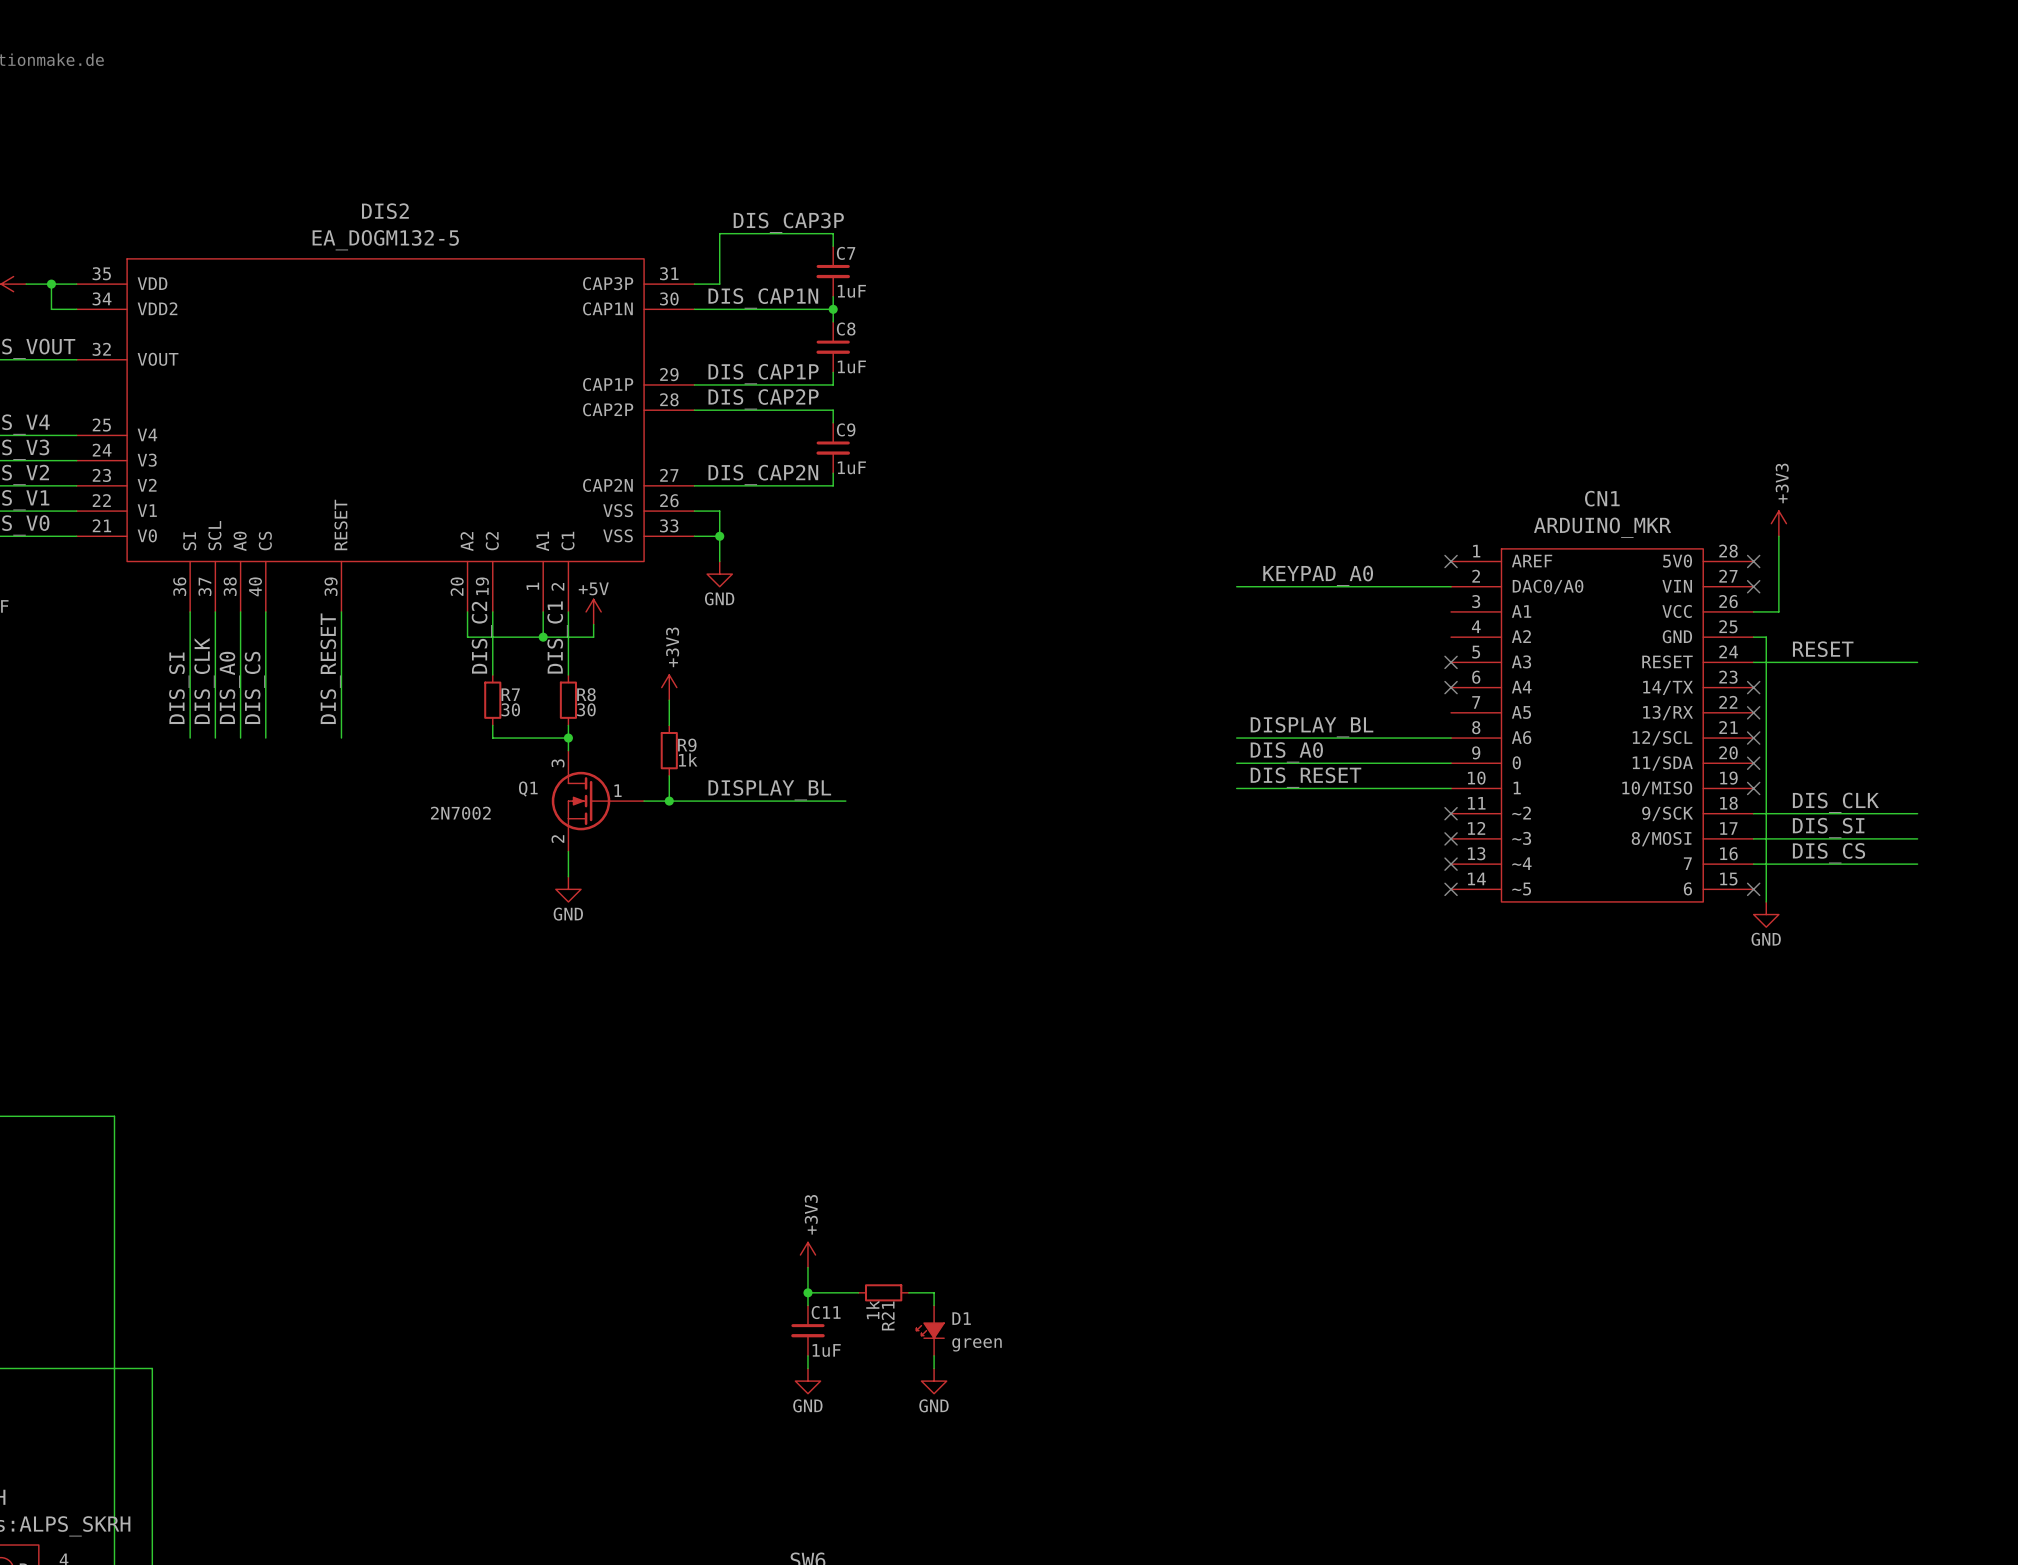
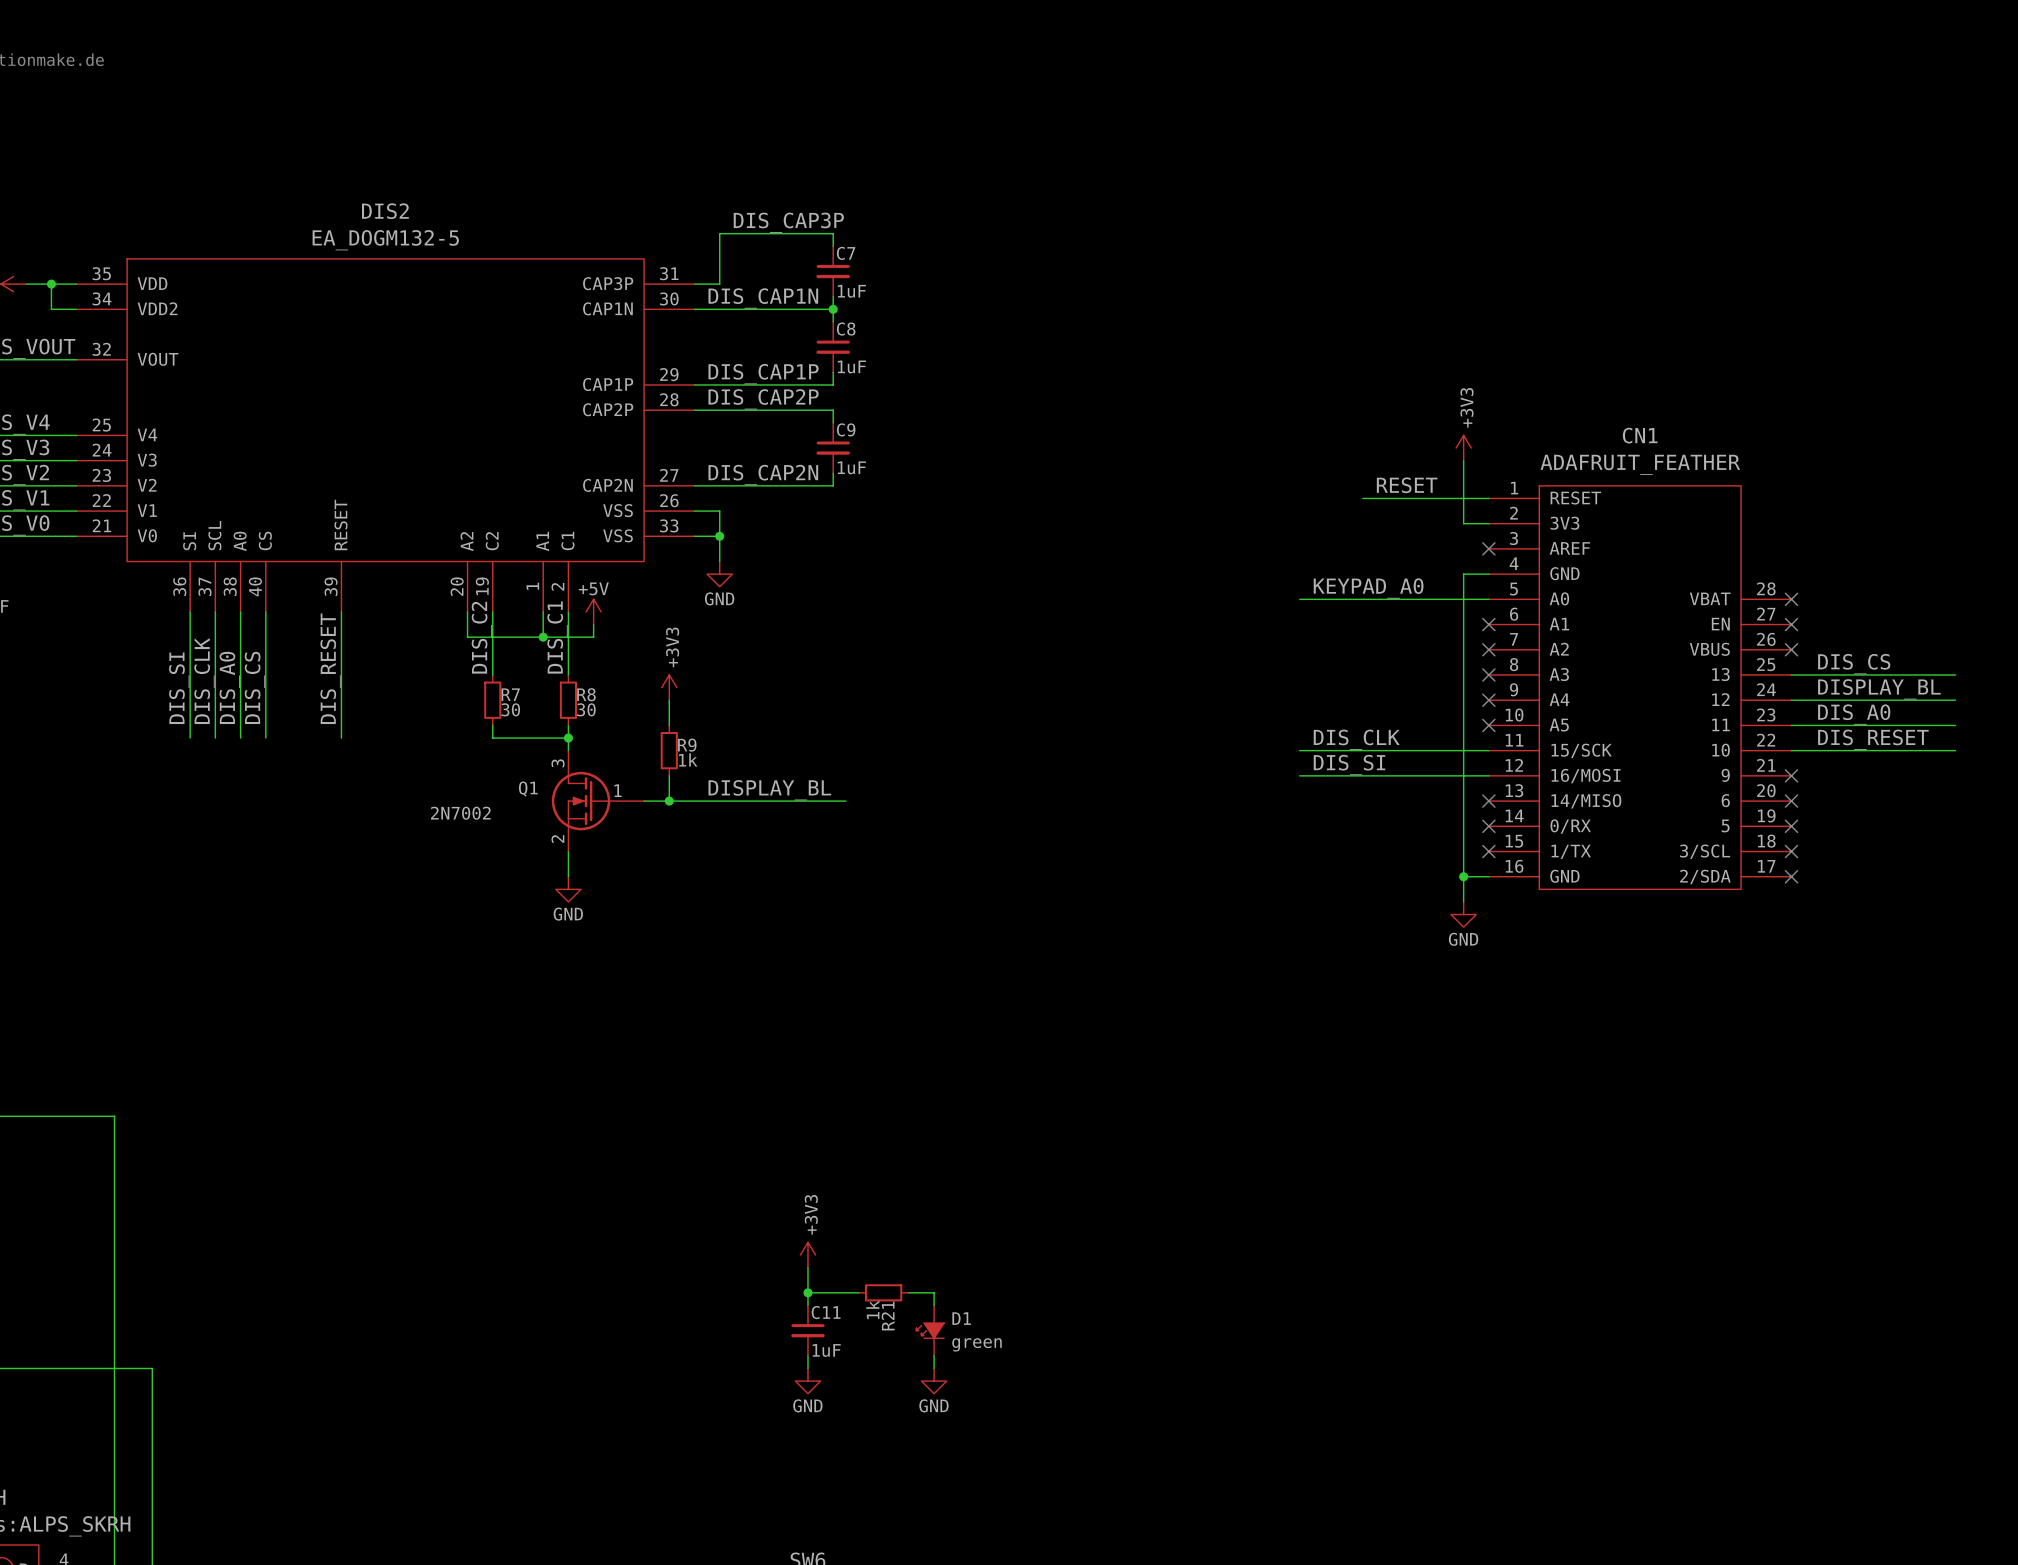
power symbol: none -> +3V3 (1463, 448)
wire: none -> (1463, 460) (1463, 523) (1488, 523)
label: none -> RESET (1407, 485)
wire: none -> (1362, 498) (1488, 498)
CN1 name position: CN1 (1602, 498) -> CN1 (1640, 435)
power symbol: +3V3 (1778, 523) -> none
CN1 value: ARDUINO_MKR (1602, 527) -> ADAFRUIT_FEATHER (1640, 464)
wire: (1778, 536) (1778, 611) (1753, 611) -> none
CN1 symbol: [1451, 548, 1754, 902] -> [1488, 485, 1792, 890]
no-connect mark: none -> (1488, 548)
no-connect mark: (1451, 561) -> none
no-connect mark: (1753, 561) -> none
wire: none -> (1488, 574) (1463, 574) (1463, 901)
label position: KEYPAD_A0 (1318, 575) -> KEYPAD_A0 (1368, 588)
wire: (1236, 586) (1451, 586) -> none
no-connect mark: (1753, 586) -> none
wire: none -> (1299, 599) (1488, 599)
no-connect mark: none -> (1791, 599)
no-connect mark: none -> (1488, 624)
no-connect mark: none -> (1791, 624)
wire: (1753, 637) (1766, 637) (1766, 901) -> none
no-connect mark: none -> (1488, 649)
no-connect mark: none -> (1791, 649)
label: RESET (1823, 649) -> none
no-connect mark: (1451, 662) -> none
wire: (1753, 662) (1917, 662) -> (1791, 674) (1955, 674)
no-connect mark: none -> (1488, 674)
no-connect mark: (1451, 687) -> none
no-connect mark: (1753, 687) -> none
label: none -> DISPLAY_BL (1879, 689)
no-connect mark: none -> (1488, 700)
no-connect mark: (1753, 712) -> none
label: none -> DIS_A0 (1854, 714)
no-connect mark: none -> (1488, 725)
label: DISPLAY_BL (1311, 727) -> none
wire: (1236, 738) (1451, 738) -> none
no-connect mark: (1753, 738) -> none
label: none -> DIS_CLK (1356, 739)
label: none -> DIS_RESET (1873, 739)
wire: none -> (1299, 750) (1488, 750)
label: DIS_A0 (1286, 752) -> none
wire: (1236, 763) (1451, 763) -> none
no-connect mark: (1753, 763) -> none
label: none -> DIS_SI (1349, 764)
wire: none -> (1299, 775) (1488, 775)
no-connect mark: none -> (1791, 775)
label: DIS_RESET (1305, 777) -> none
wire: (1236, 788) (1451, 788) -> none
no-connect mark: (1753, 788) -> none
no-connect mark: none -> (1488, 801)
no-connect mark: none -> (1791, 801)
label: DIS_CLK (1835, 802) -> none
no-connect mark: (1451, 813) -> none
wire: (1753, 813) (1917, 813) -> (1791, 700) (1955, 700)
no-connect mark: none -> (1488, 826)
no-connect mark: none -> (1791, 826)
label: DIS_SI (1828, 828) -> none
no-connect mark: (1451, 838) -> none
wire: (1753, 838) (1917, 838) -> (1791, 725) (1955, 725)
no-connect mark: none -> (1488, 851)
no-connect mark: none -> (1791, 851)
label position: DIS_CS (1828, 853) -> DIS_CS (1854, 664)
no-connect mark: (1451, 864) -> none
wire: (1753, 864) (1917, 864) -> (1791, 750) (1955, 750)
wire: none -> (1463, 876) (1488, 876)
junction: none -> (1463, 876)
no-connect mark: none -> (1791, 876)
no-connect mark: (1451, 889) -> none
no-connect mark: (1753, 889) -> none
power symbol: none -> GND (1463, 914)
power symbol: GND (1766, 914) -> none

